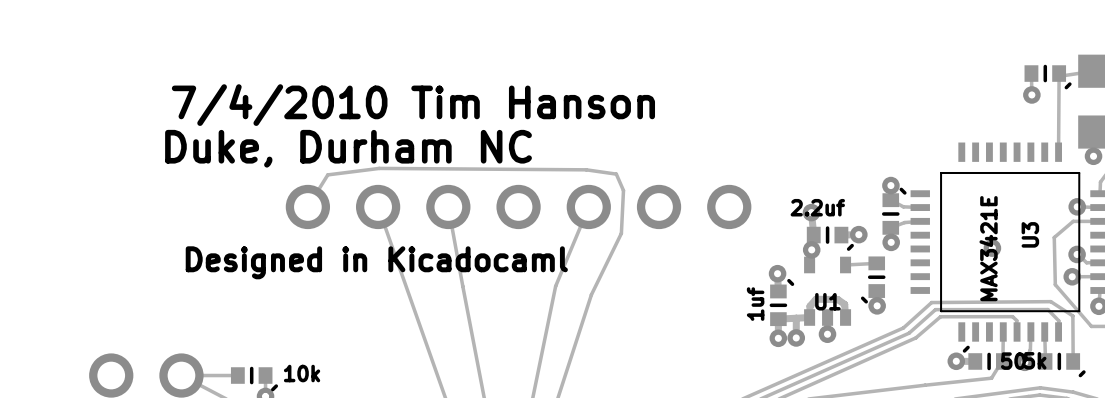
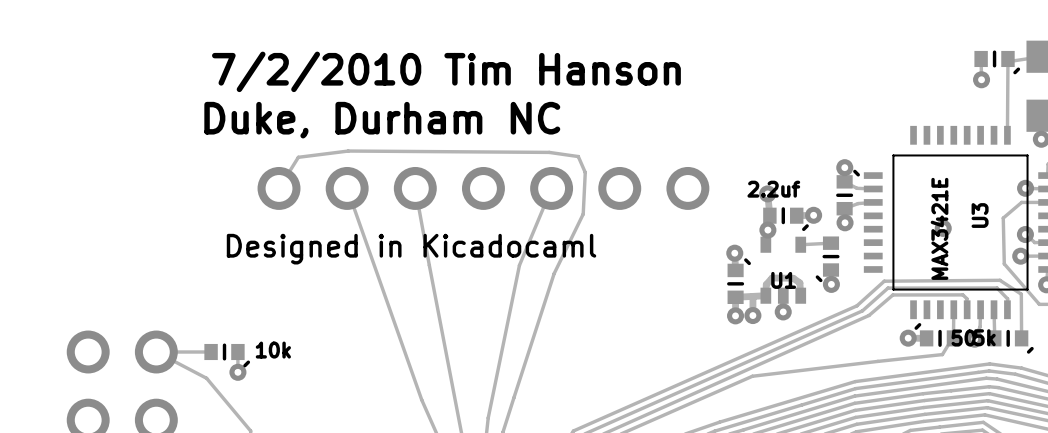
Duke, Durham NC value: 7/4/2010 Tim Hanson (413, 105) -> 7/2/2010 Tim Hanson (446, 71)
Duke, Durham NC name position: Duke, Durham NC (348, 148) -> Duke, Durham NC (382, 120)
Designed in Kicadocaml name: Designed in Kicadocaml (376, 262) -> none
Designed in Kicadocaml value: 1uf (755, 304) -> Designed in Kicadocaml (411, 249)

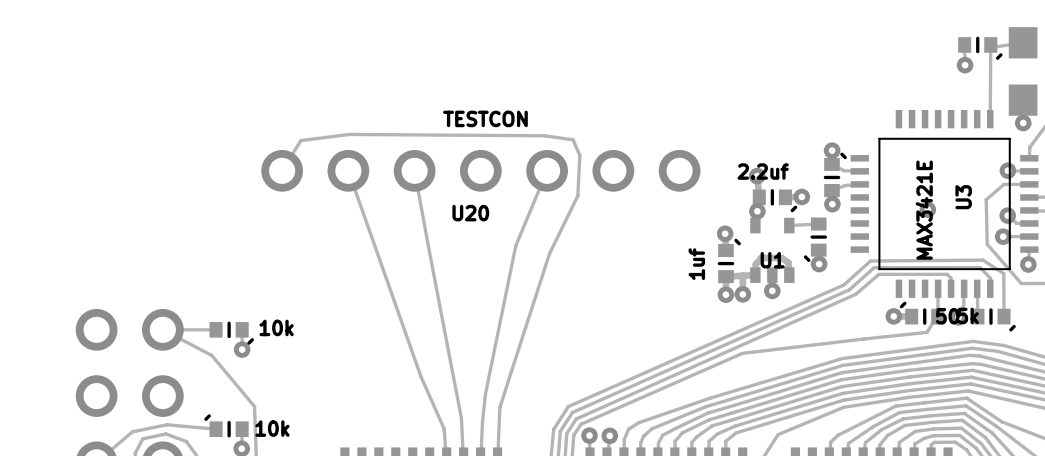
Duke, Durham NC value: 7/2/2010 Tim Hanson (446, 71) -> TESTCON (485, 118)
Duke, Durham NC name: Duke, Durham NC (382, 120) -> U20 (470, 213)
part value: Designed in Kicadocaml (411, 249) -> 1uf (696, 264)

